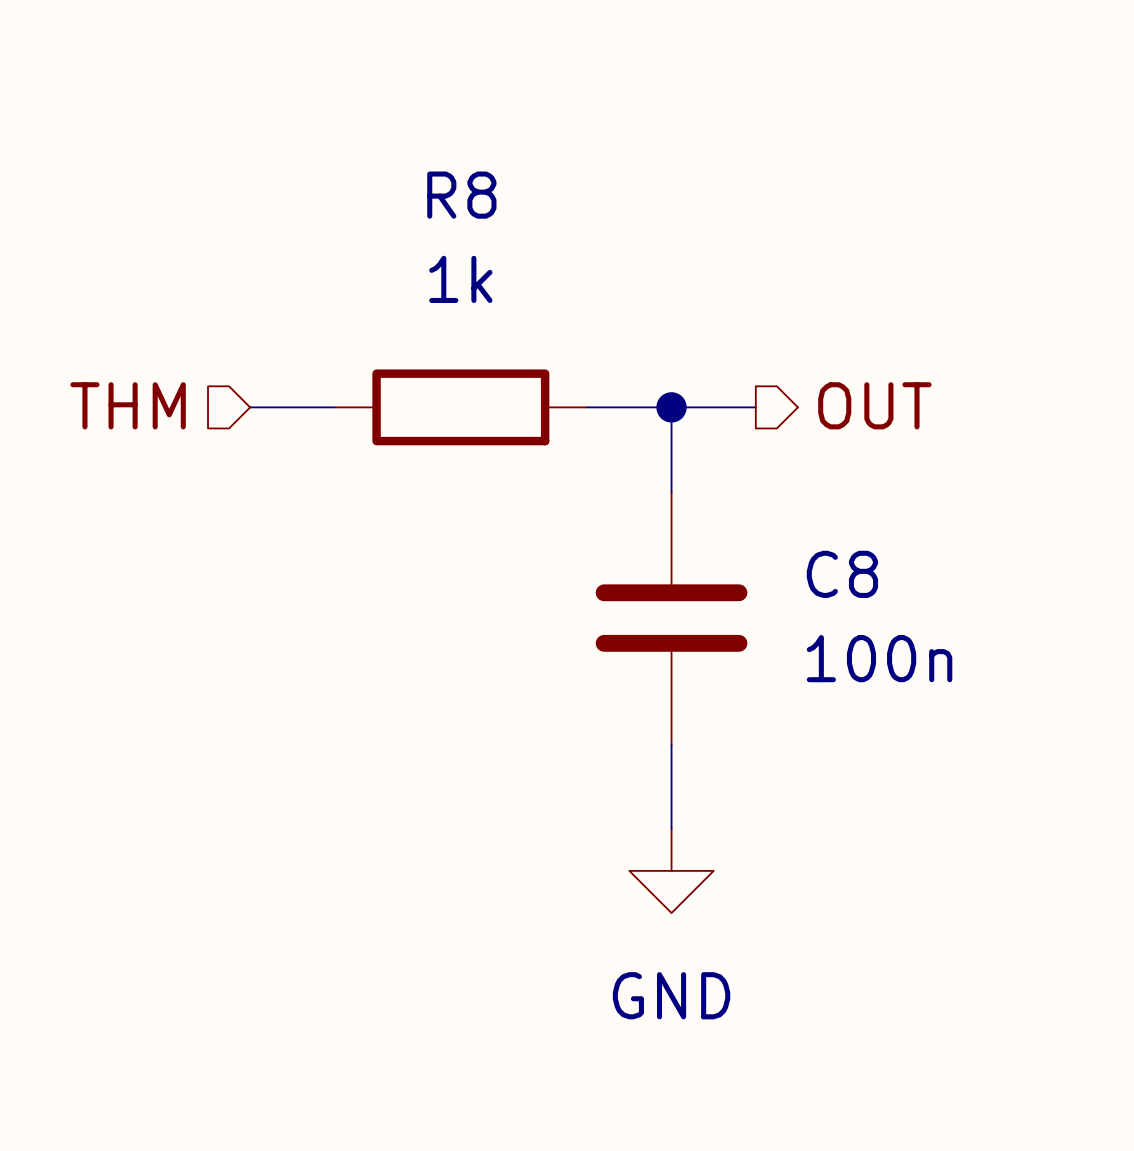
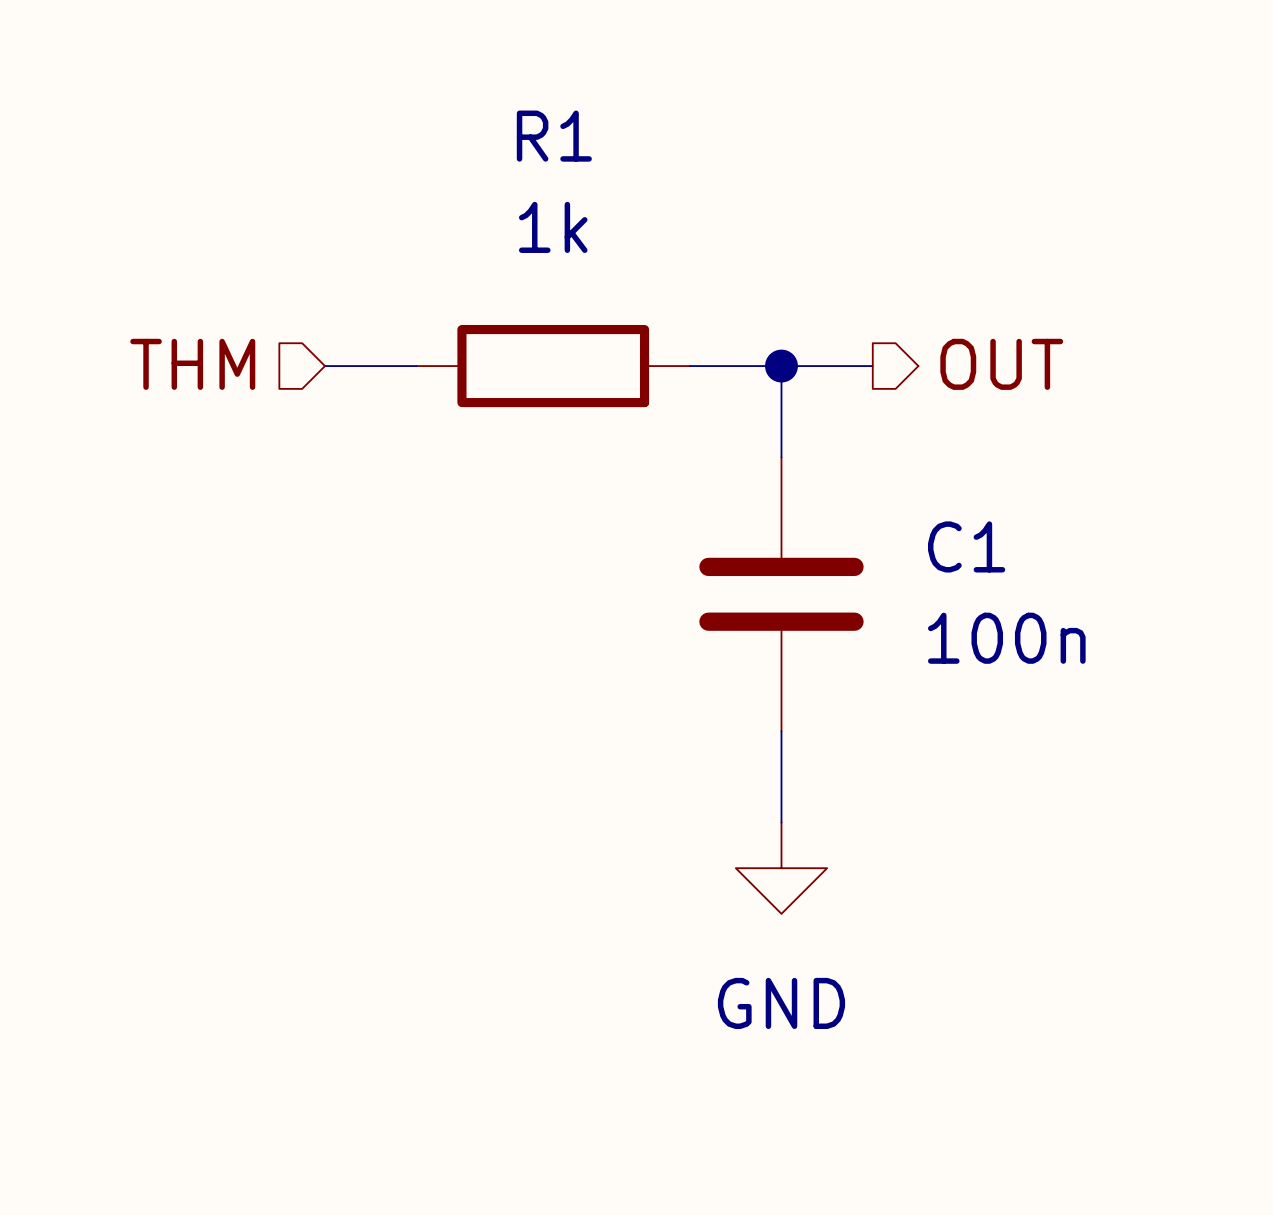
R8 name: R8 (461, 195) -> R1 (554, 136)
C8 name: C8 (842, 574) -> C1 (966, 546)

